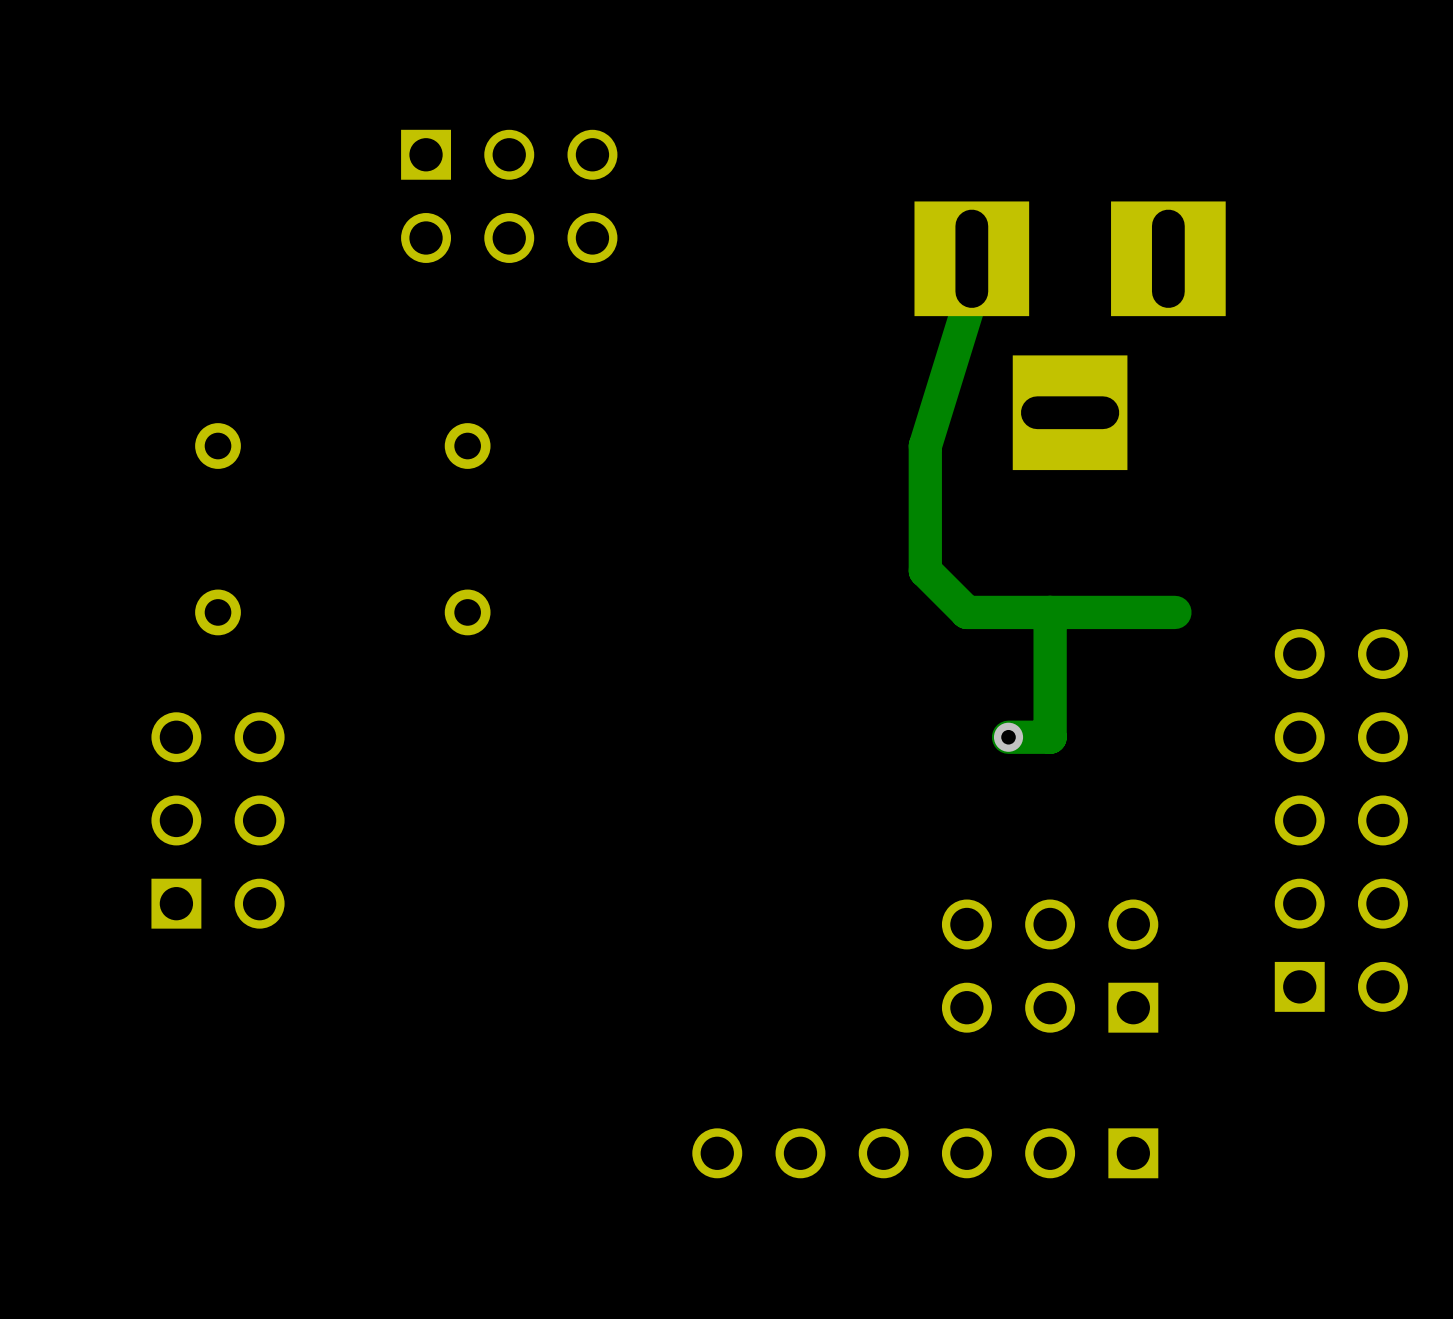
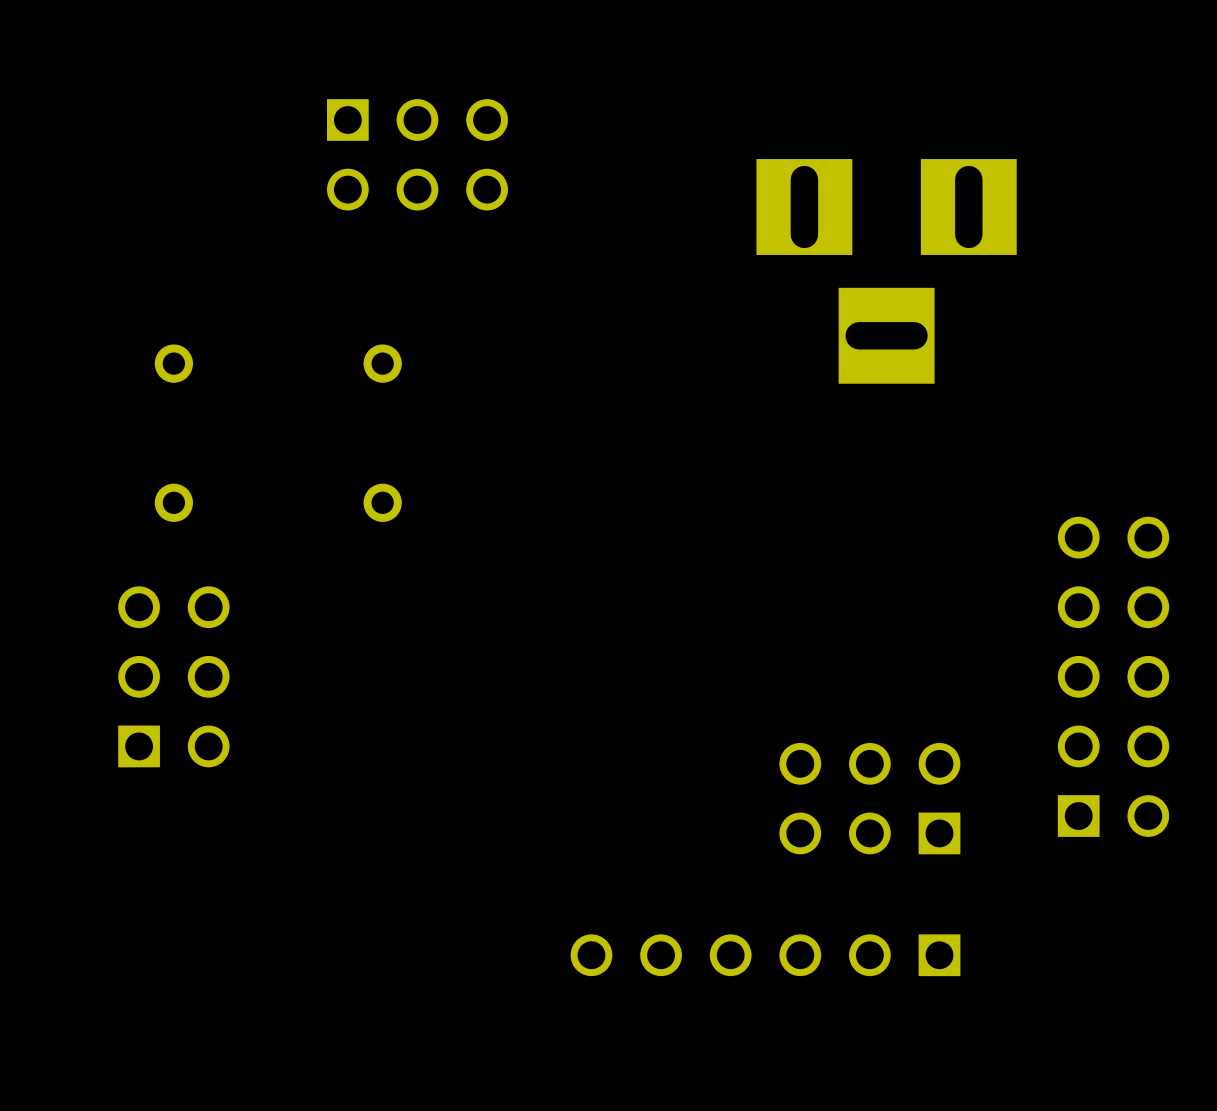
track: (971, 258) (971, 295) (925, 446) (925, 570) (966, 612) (1174, 612) -> none
track: (1050, 612) (1050, 737) (1008, 737) -> none
via: (1008, 737) -> none

